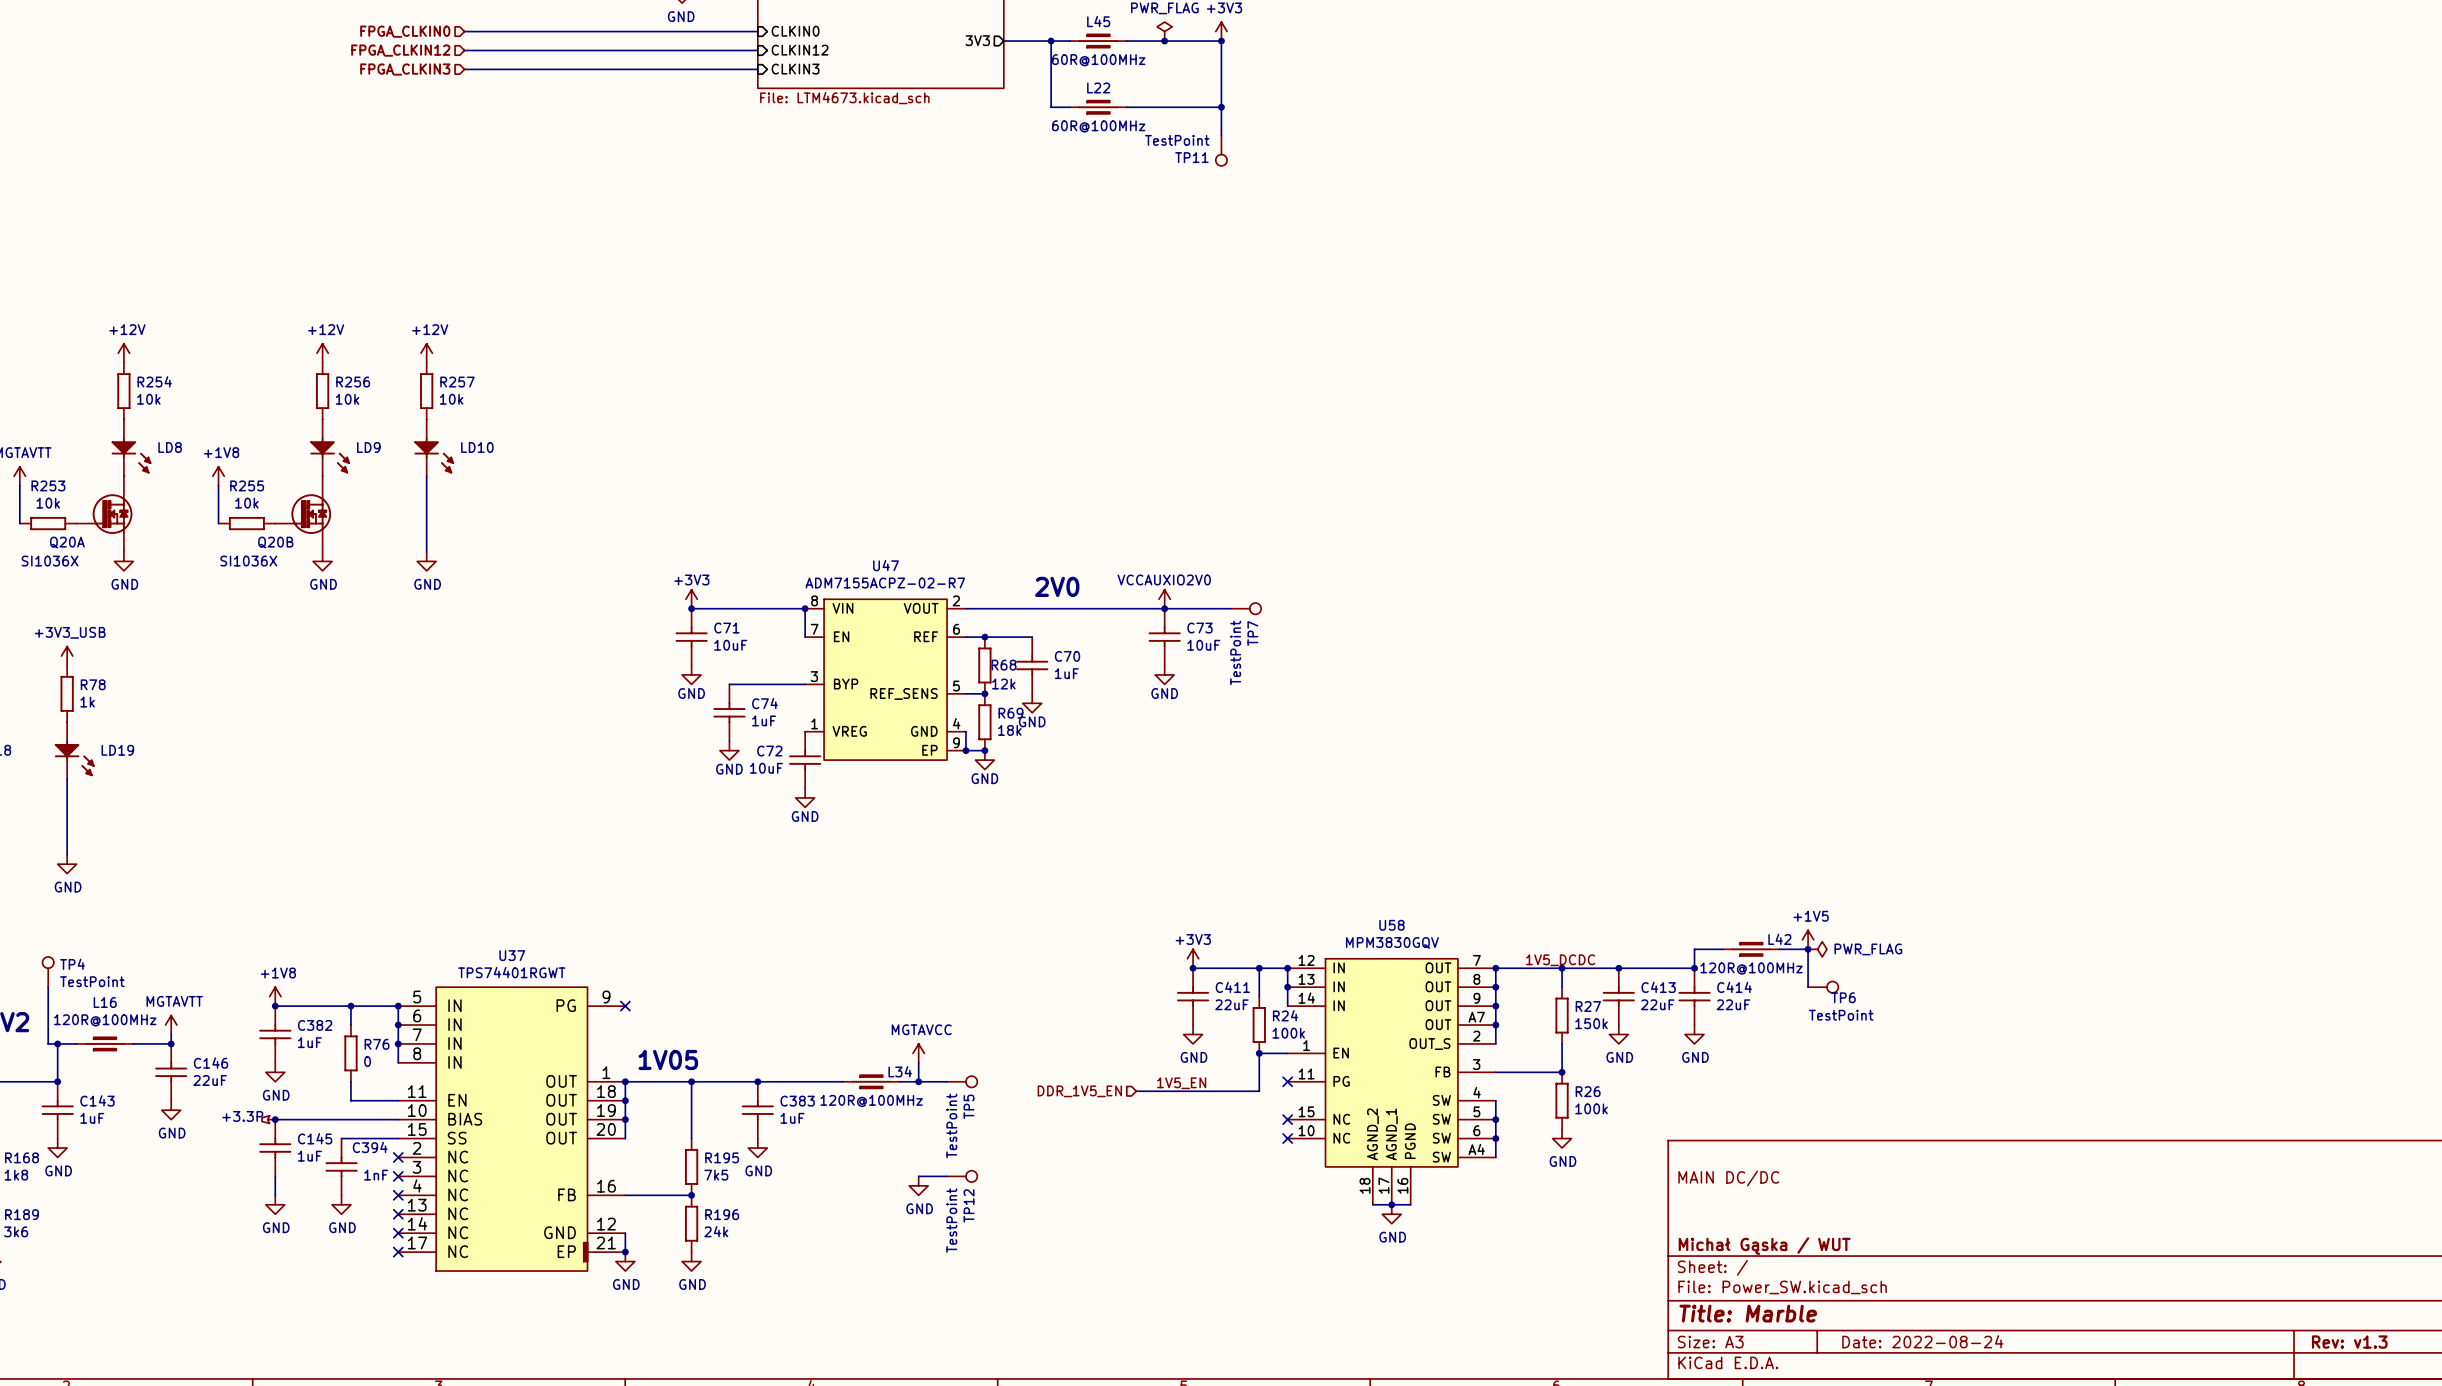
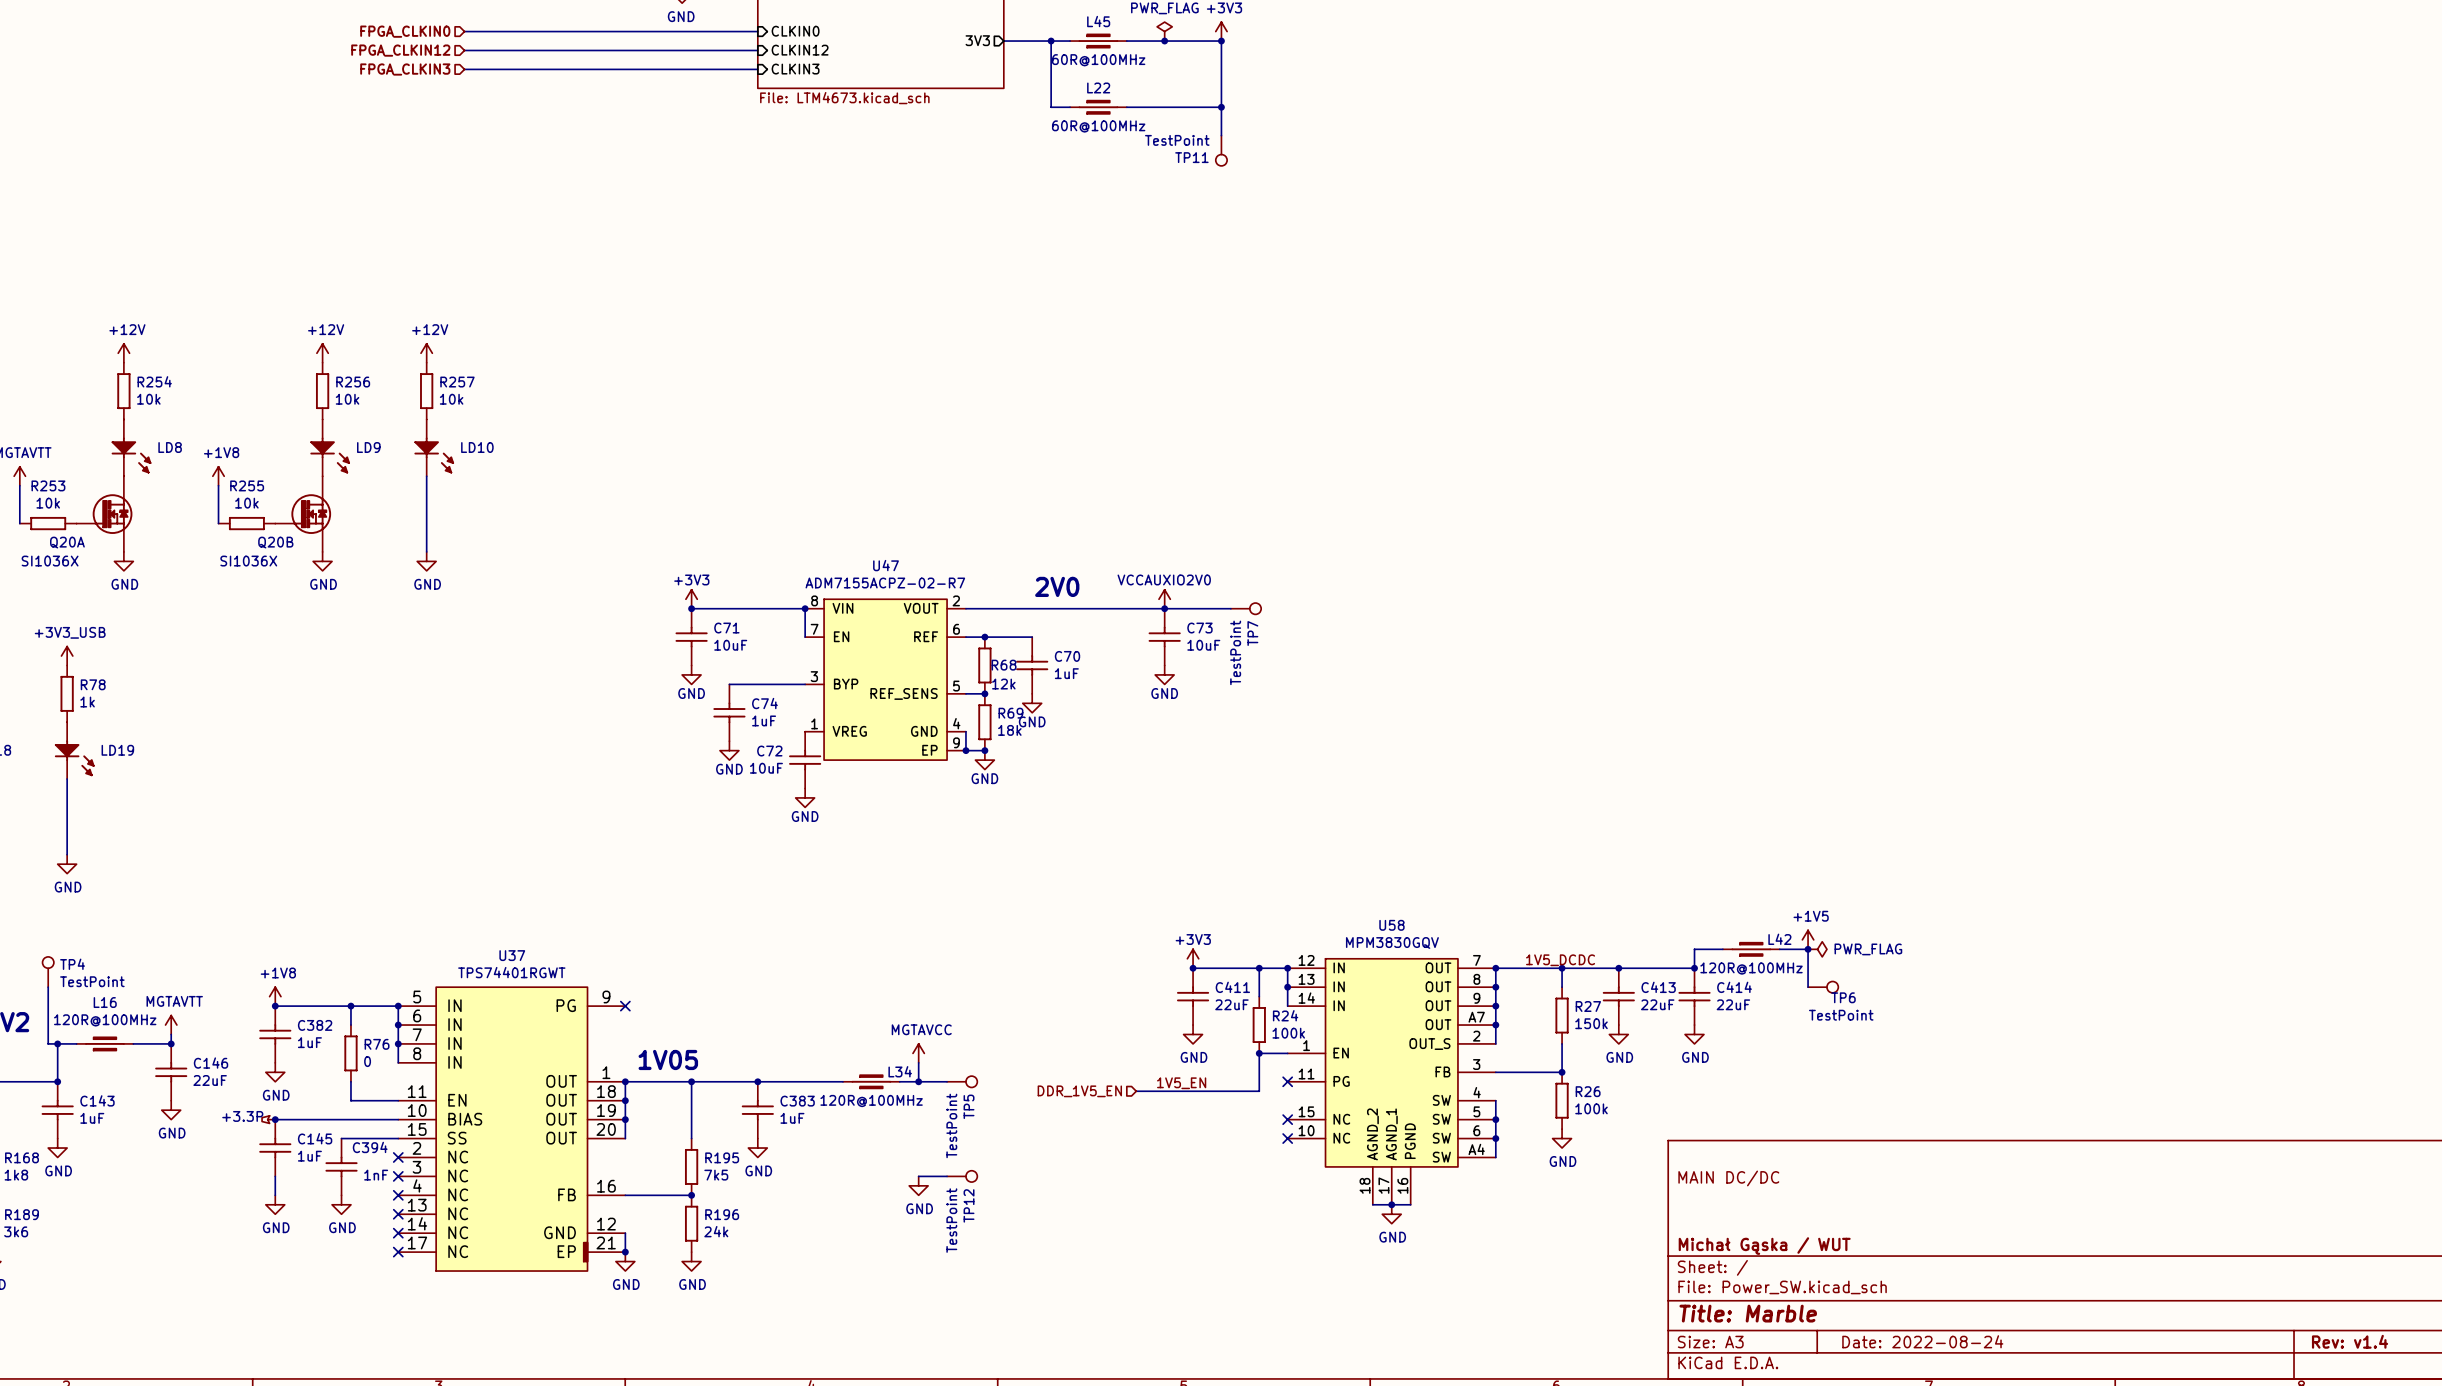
title block: Rev: v1.3 (2349, 1342) -> Rev: v1.4 (2350, 1341)

